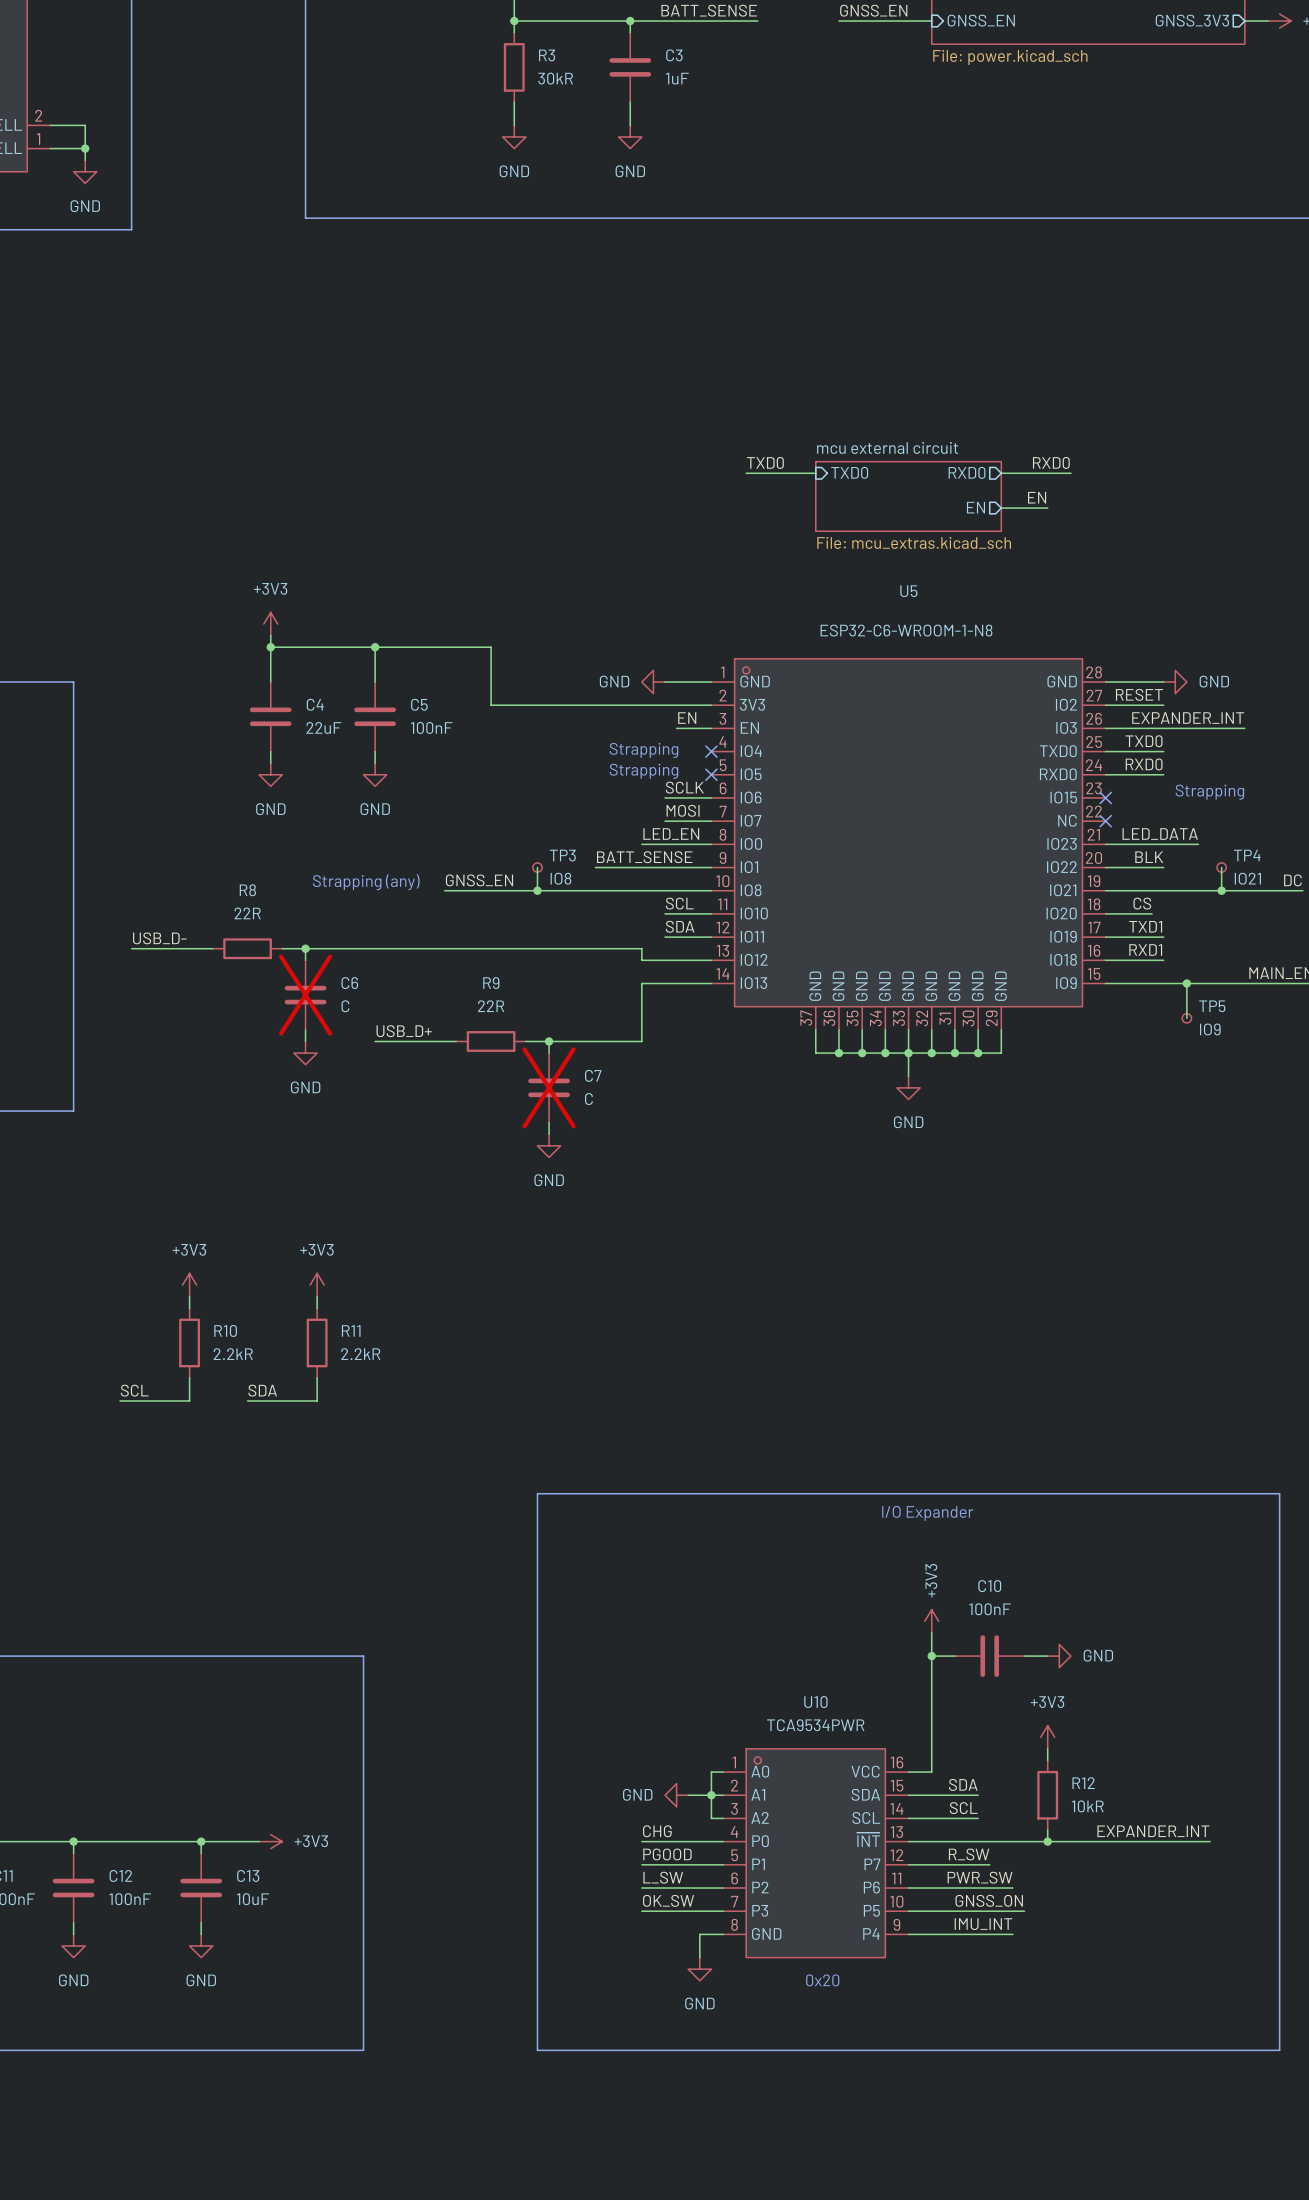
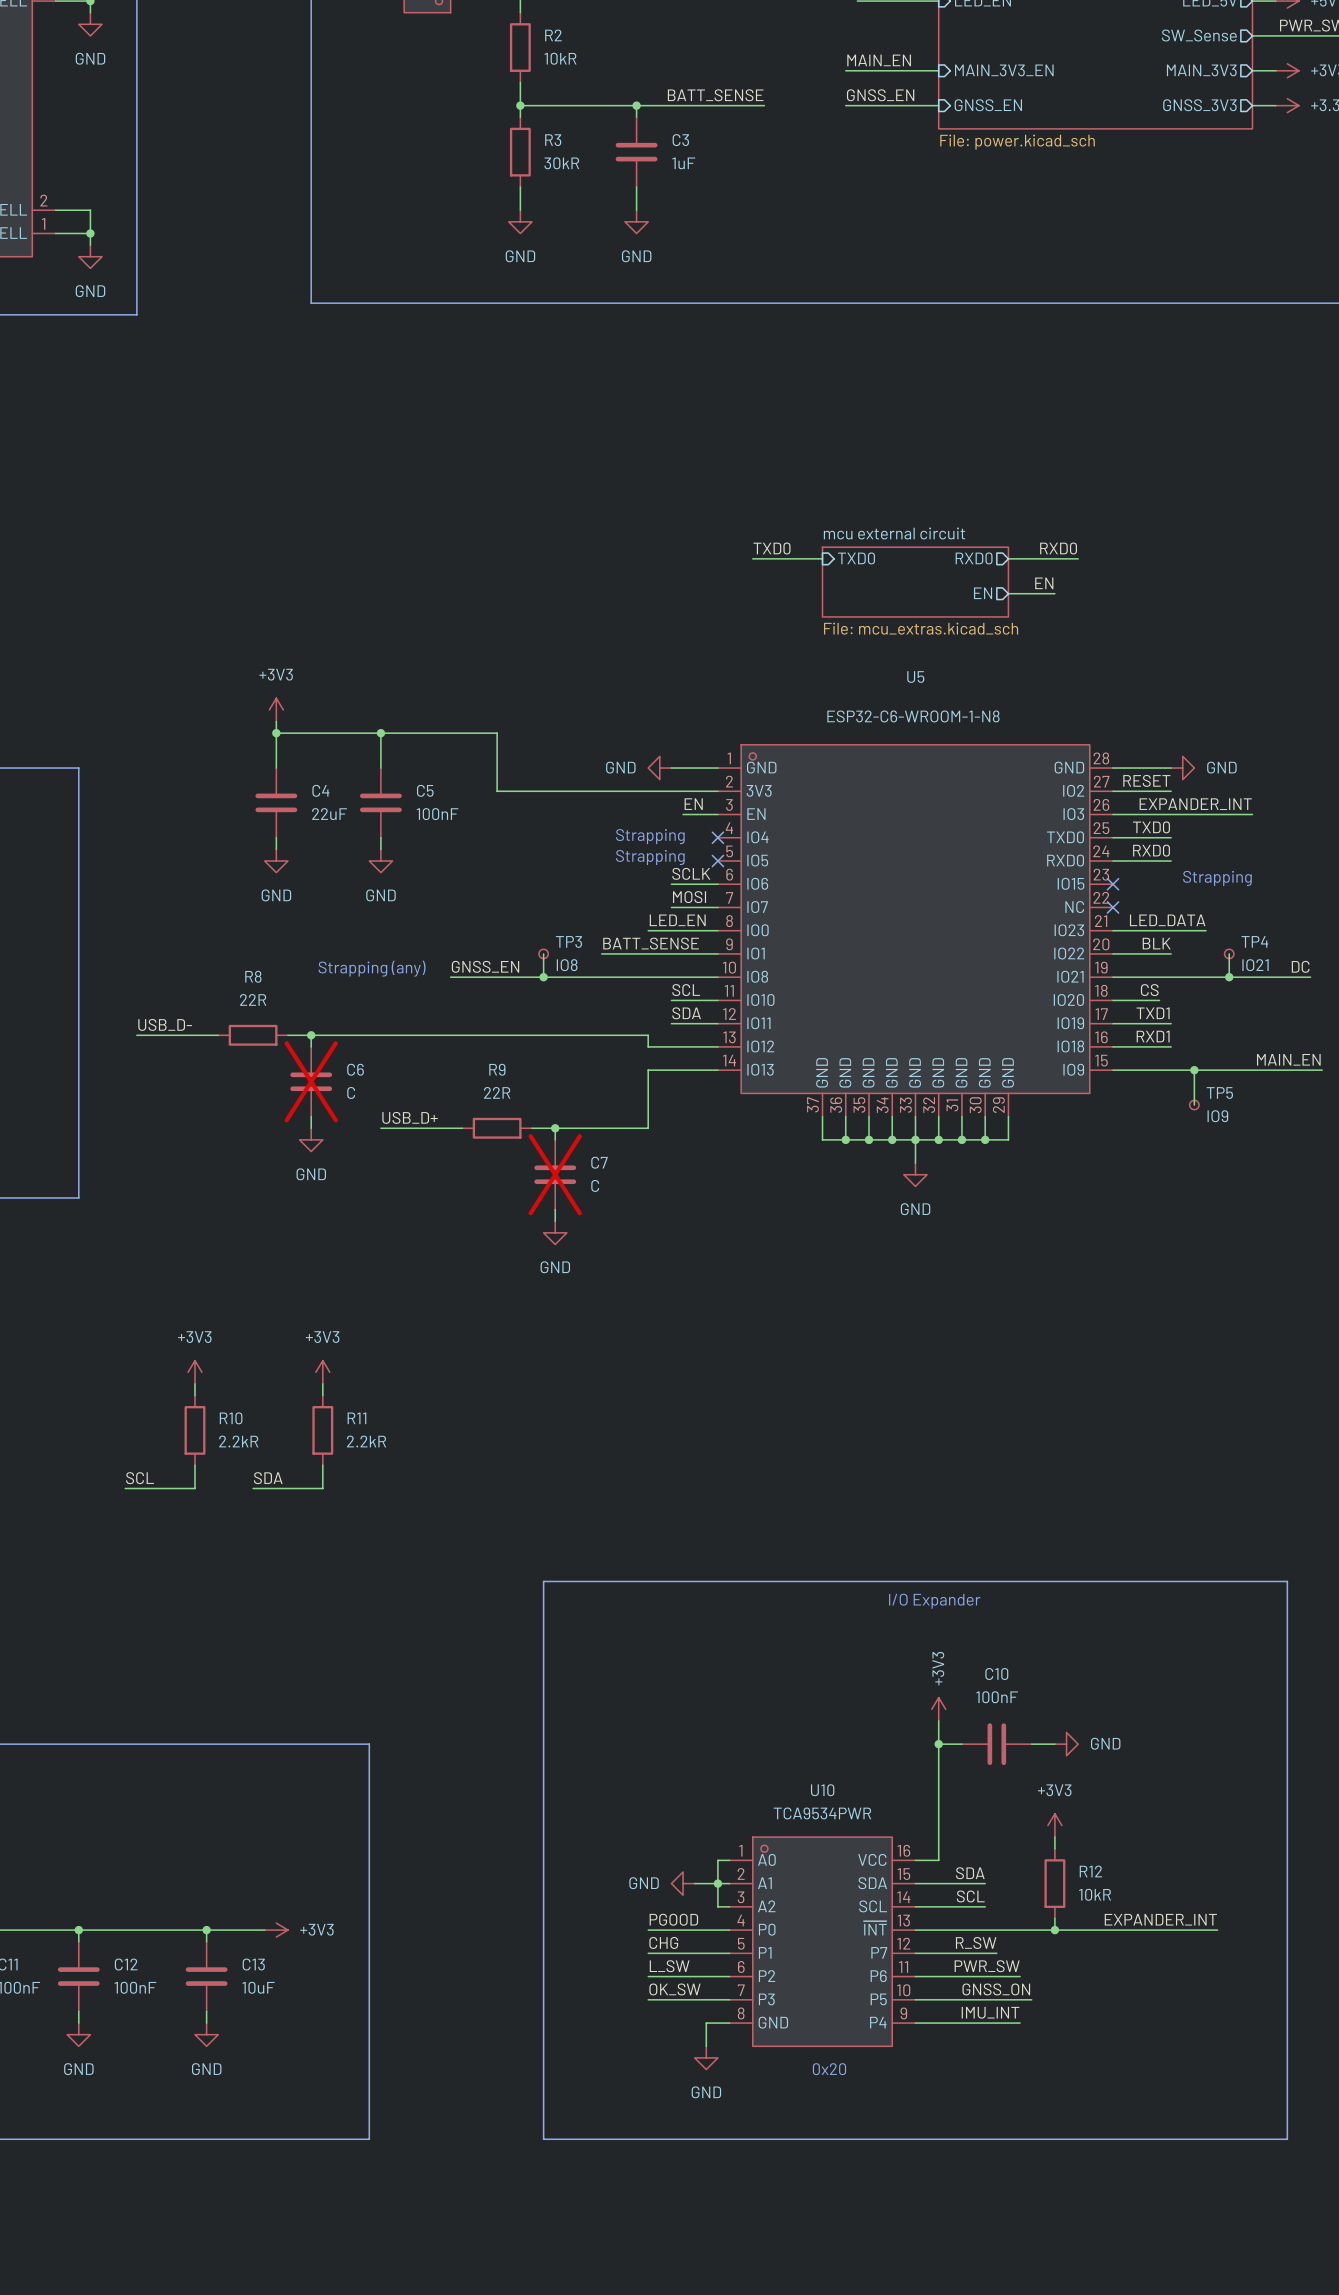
label: CHG (657, 1831) -> PGOOD (673, 1919)
label: PGOOD (667, 1854) -> CHG (663, 1942)

